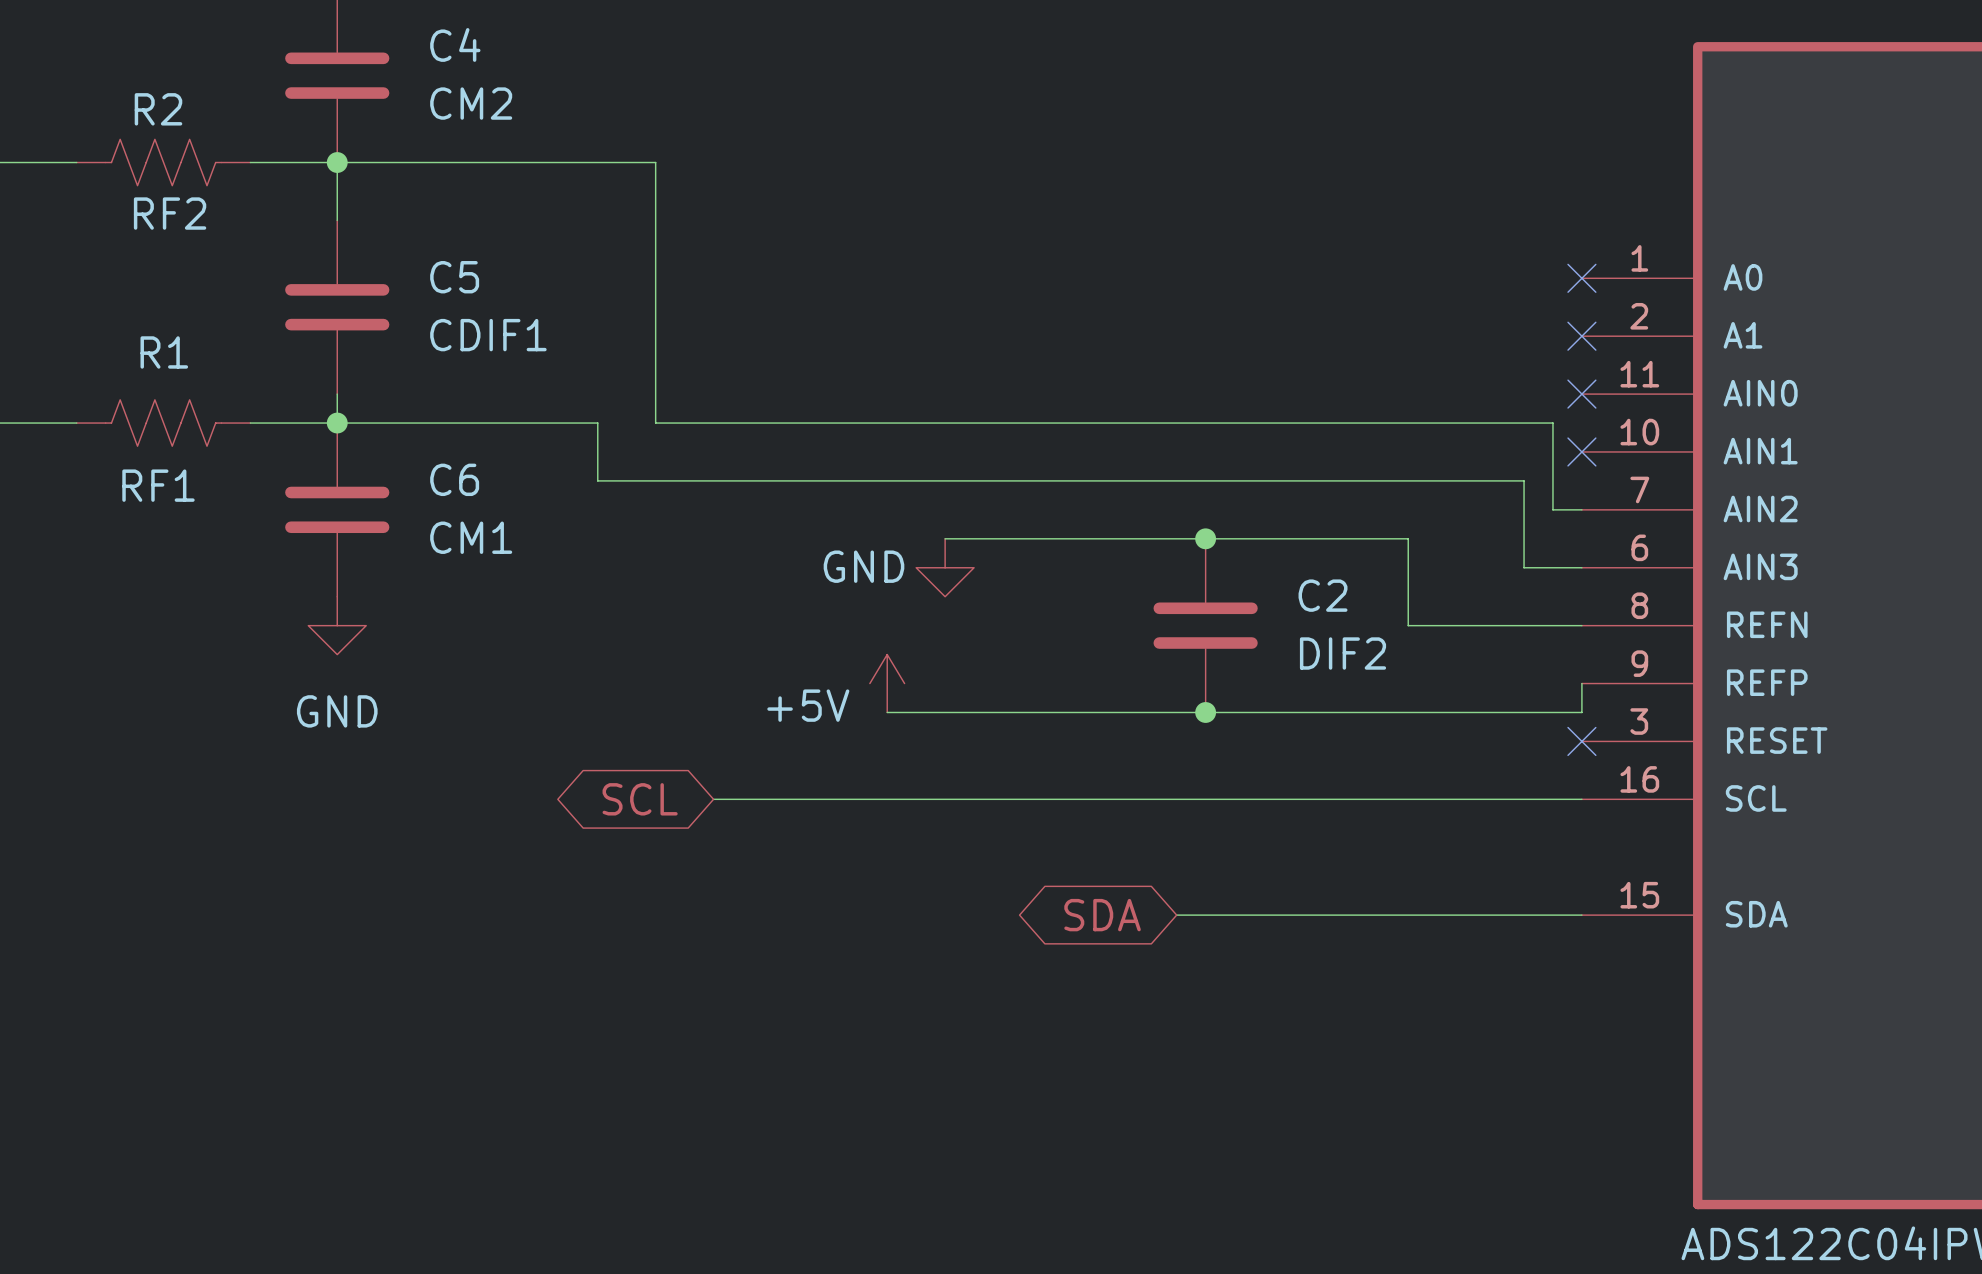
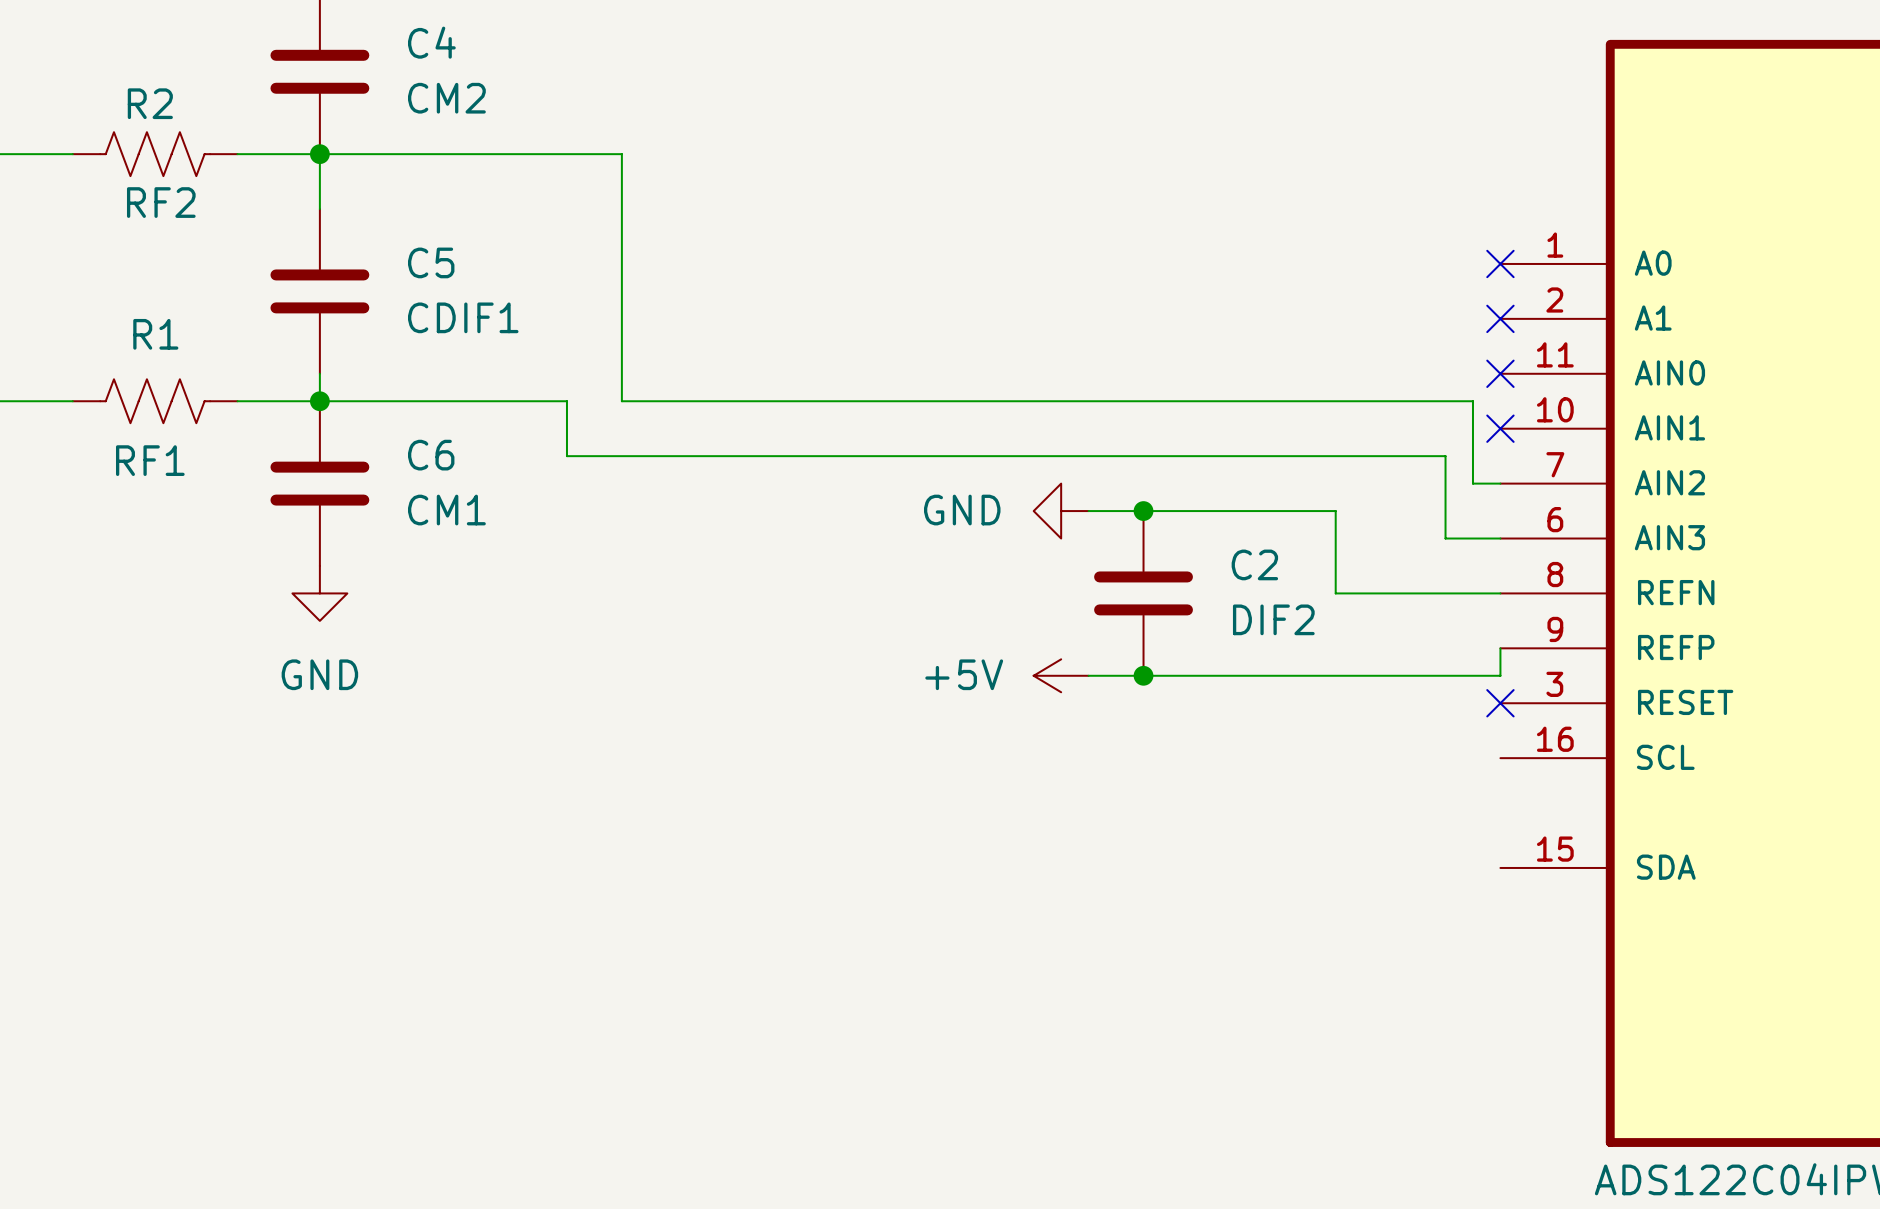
wire: (945, 538) (1147, 538) -> none
power symbol rotation: 0° (945, 567) -> 90° clockwise (1061, 511)
power symbol position: GND (945, 567) -> GND (1061, 511)
power symbol rotation: 0° (887, 683) -> 90° counterclockwise (1061, 675)
power symbol position: +5V (887, 683) -> +5V (1061, 675)
wire: (887, 712) (1147, 712) -> none
global label: SCL (640, 799) -> none
wire: (713, 799) (1581, 799) -> none
global label: SDA (1102, 915) -> none
wire: (1176, 915) (1581, 915) -> none

